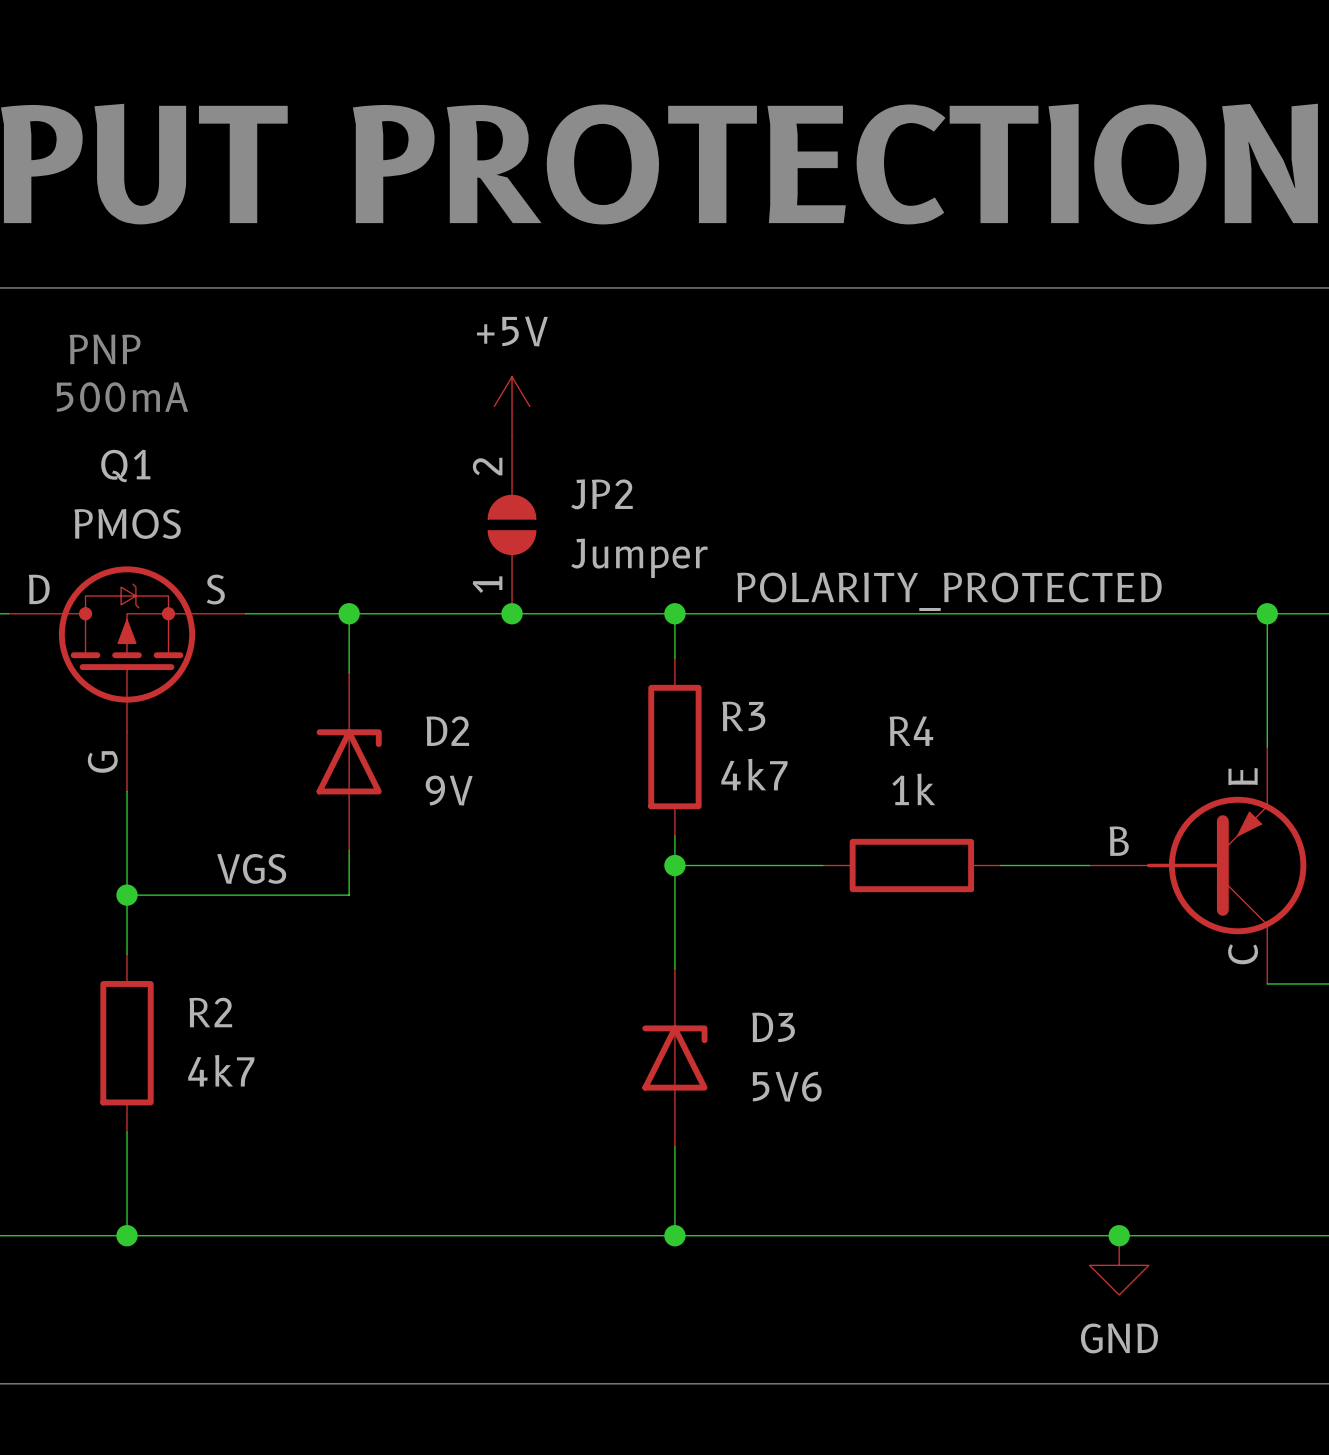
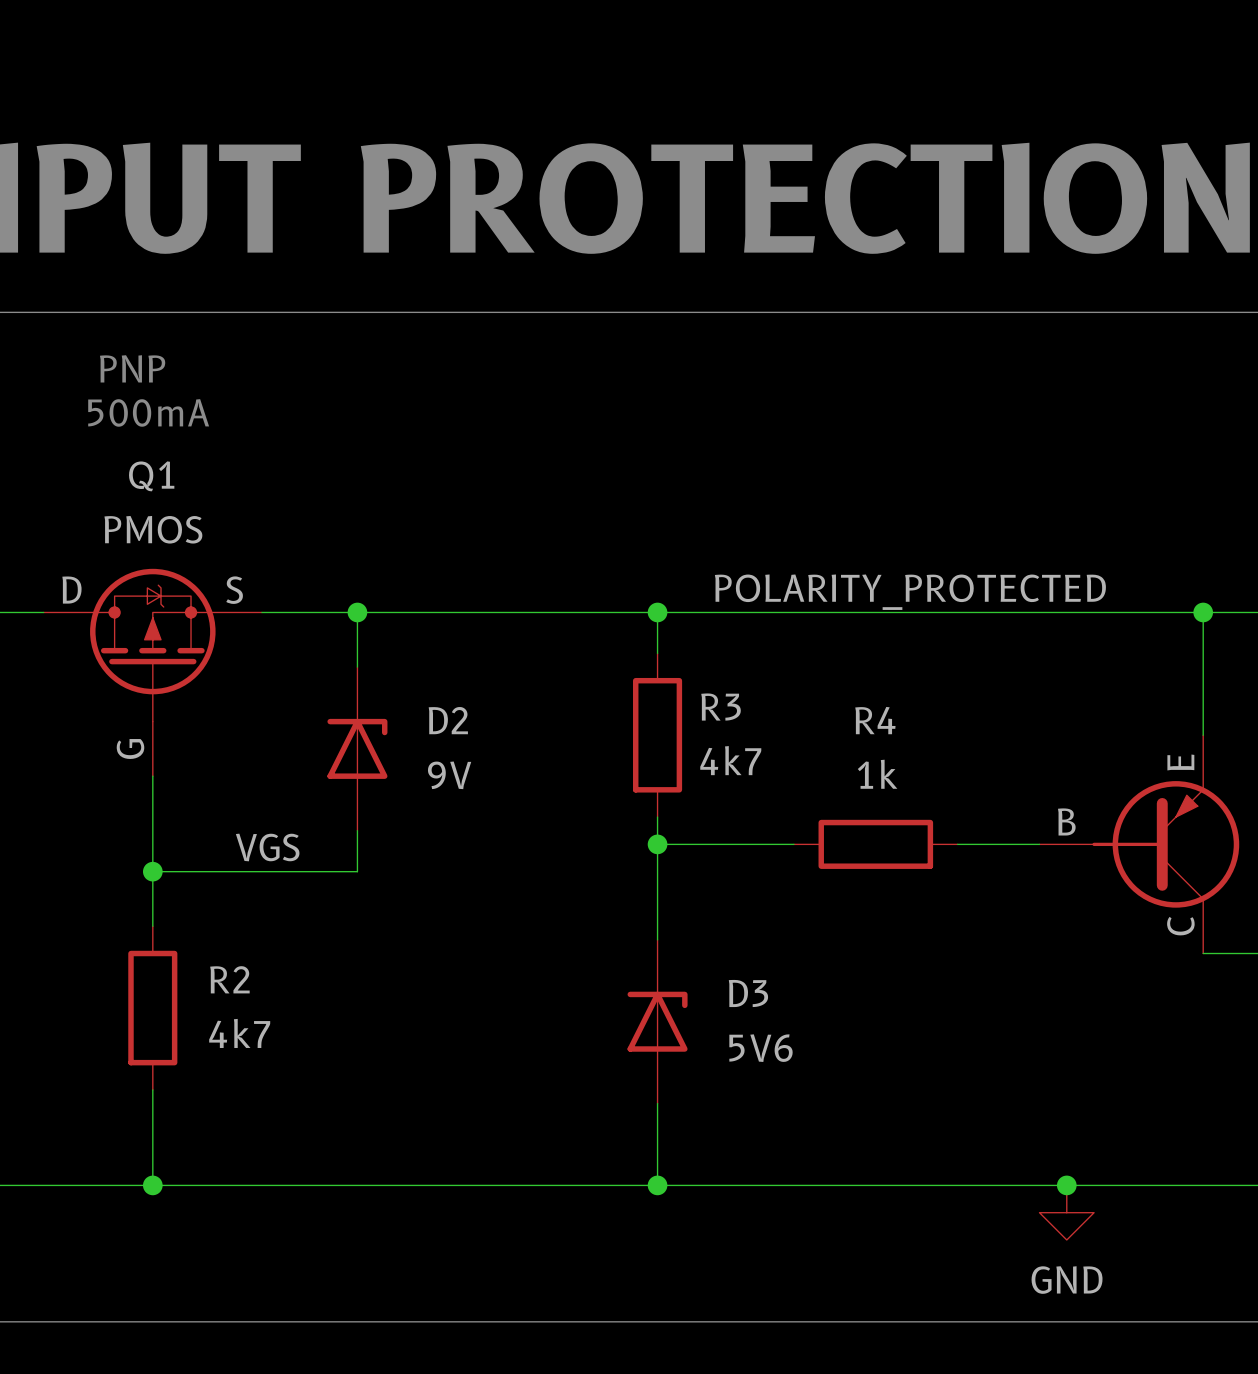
power symbol: +5V (512, 406) -> none
JP2: Jumper (512, 524) -> none
junction: (512, 613) -> none

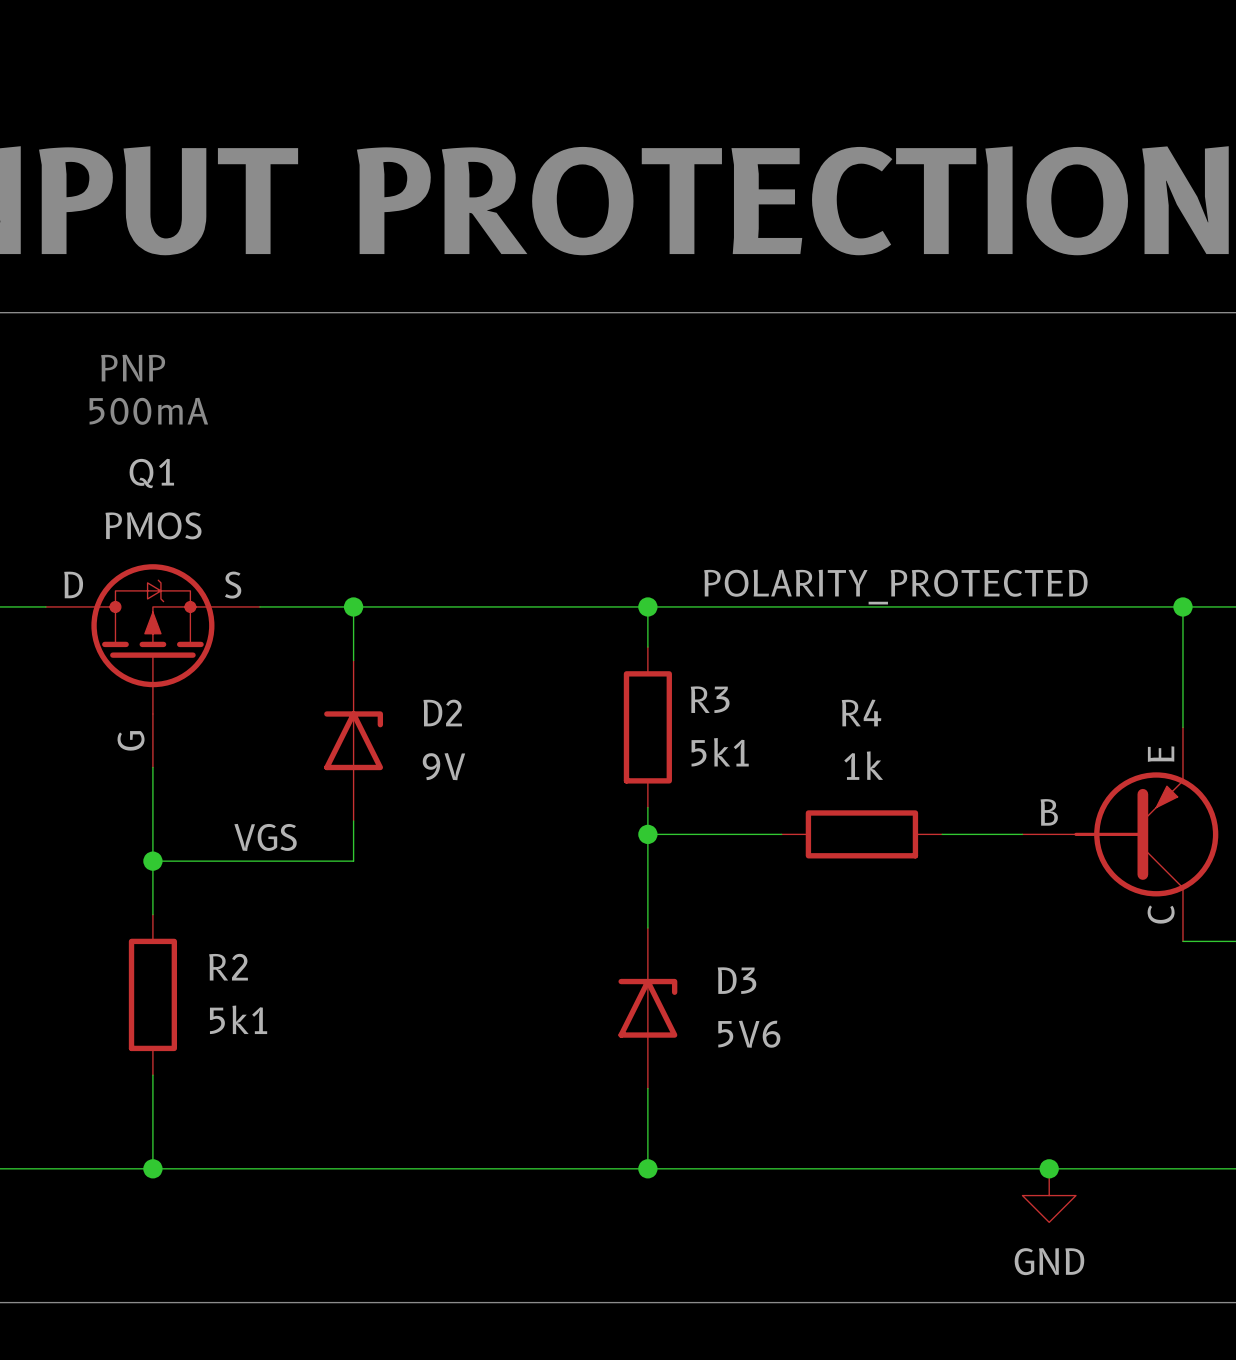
R3 value: 4k7 (730, 760) -> 5k1 (720, 752)
R2 value: 4k7 (239, 1033) -> 5k1 (238, 1019)

